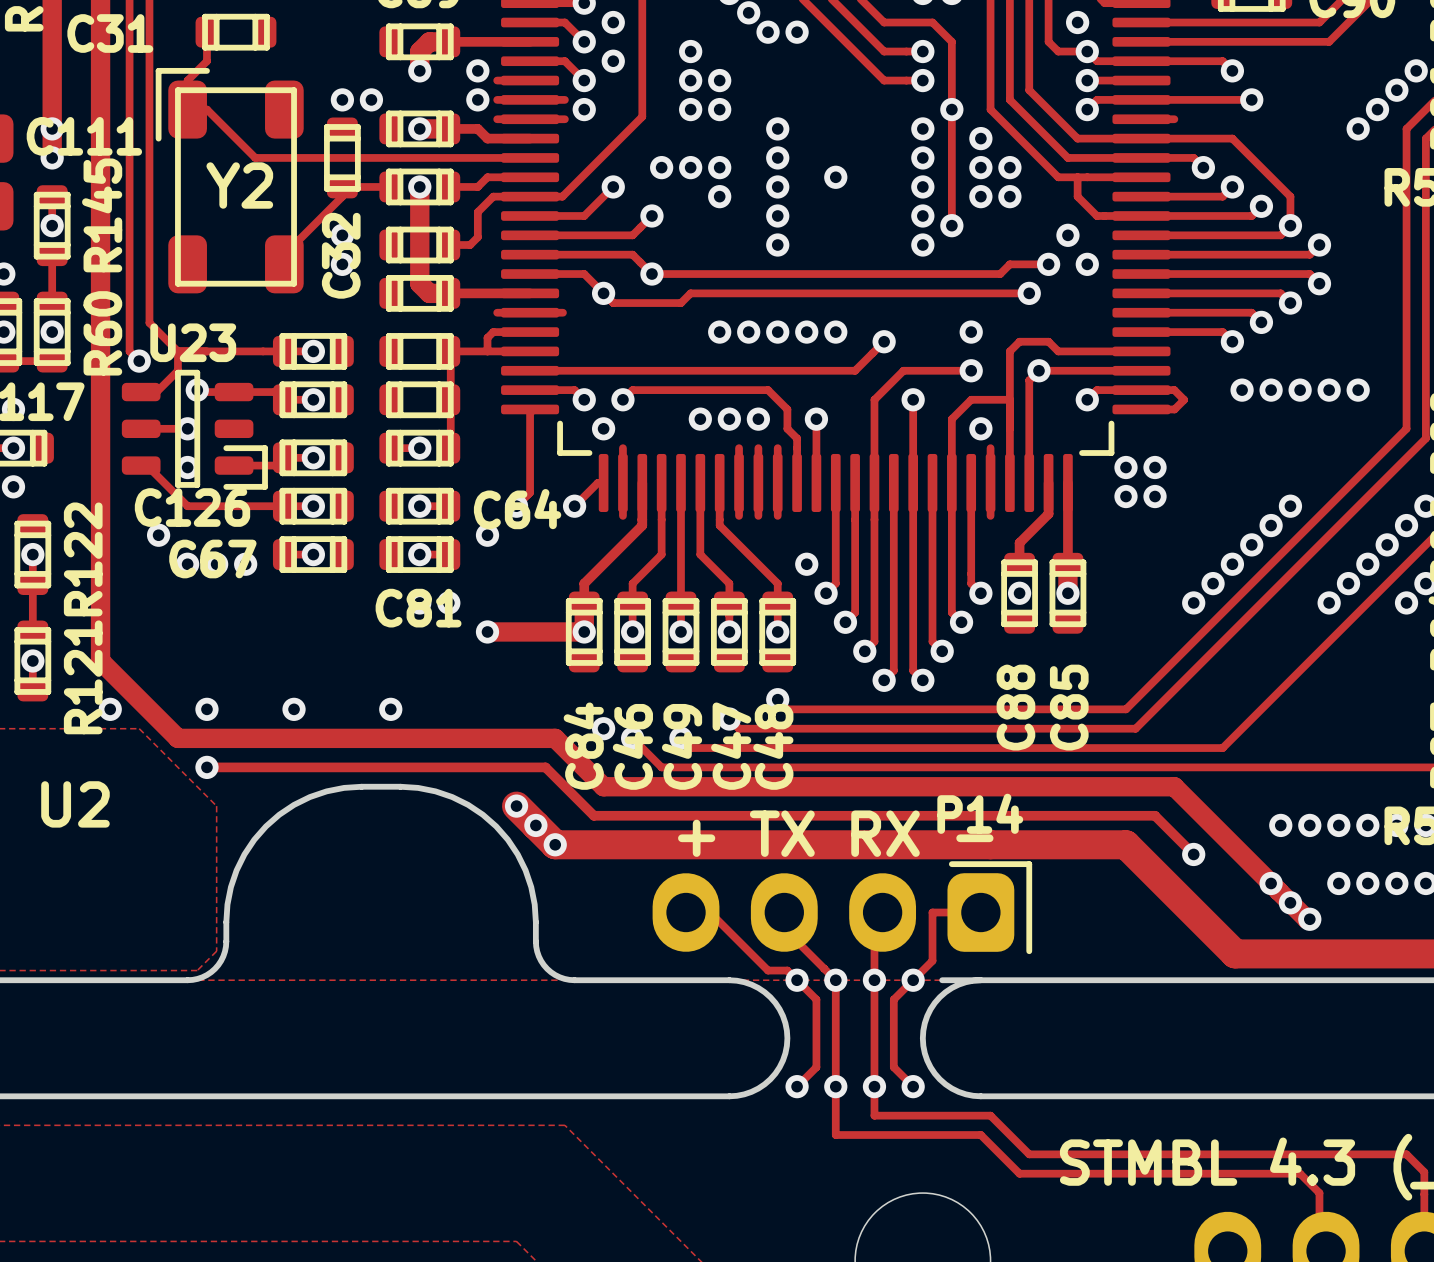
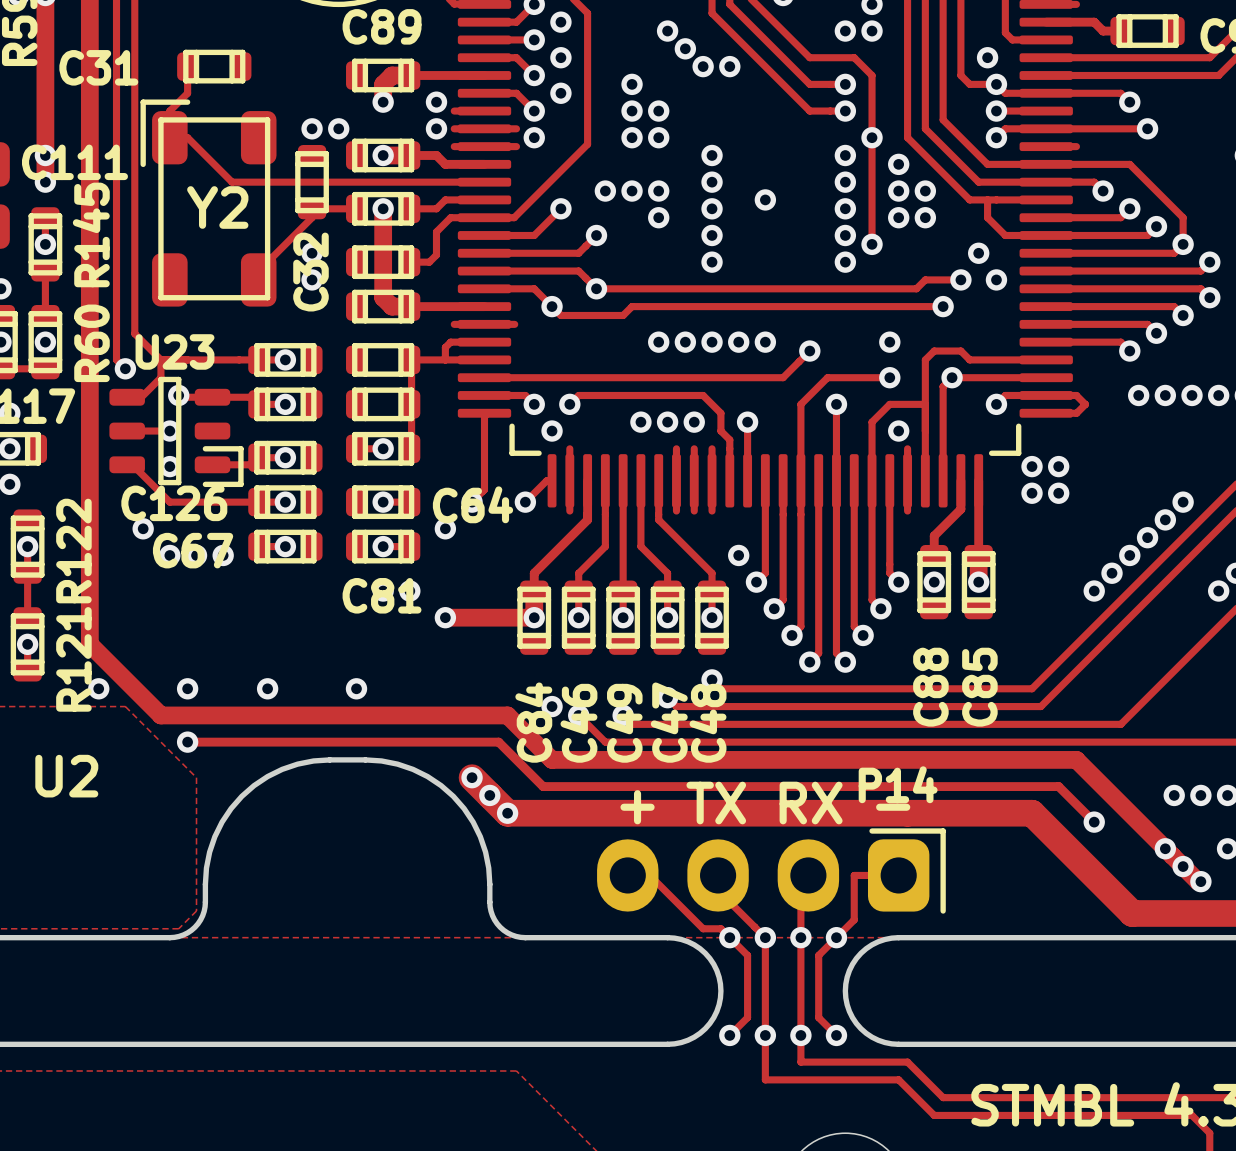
board edge: (942, 980) (980, 980) -> none

